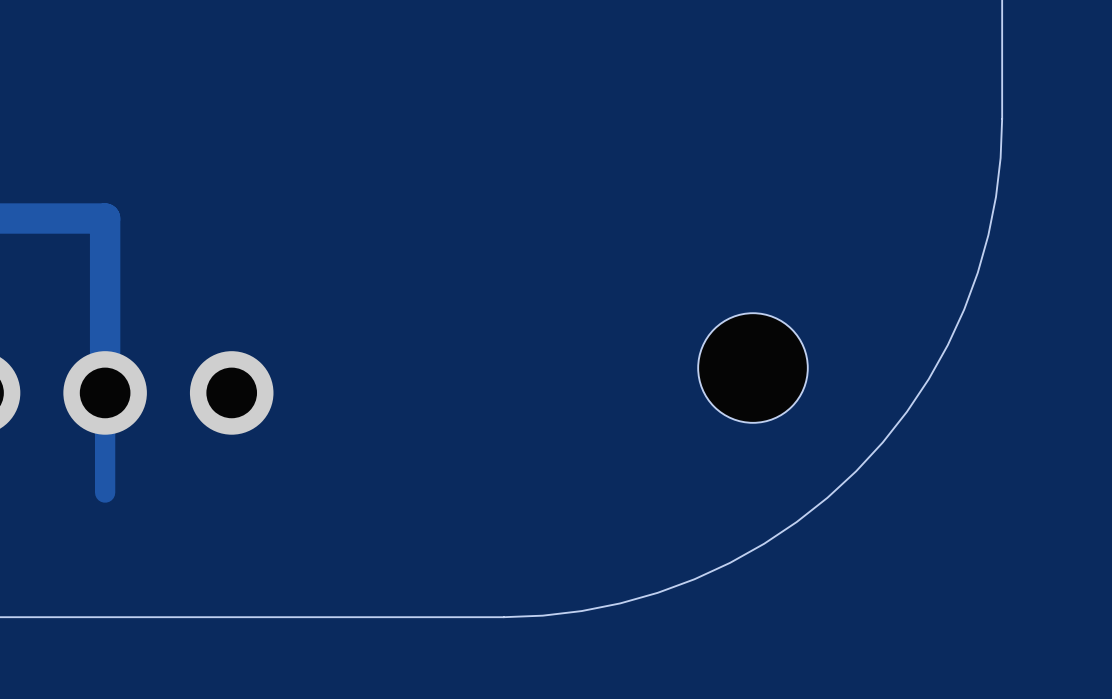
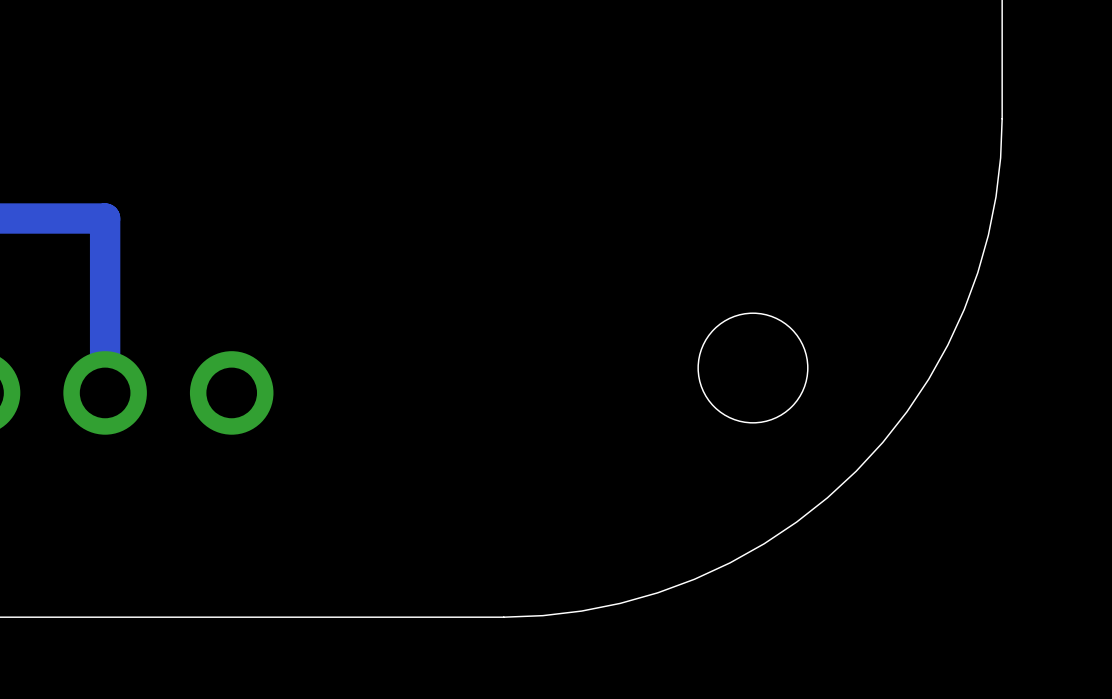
track: (105, 392) (105, 492) -> none

